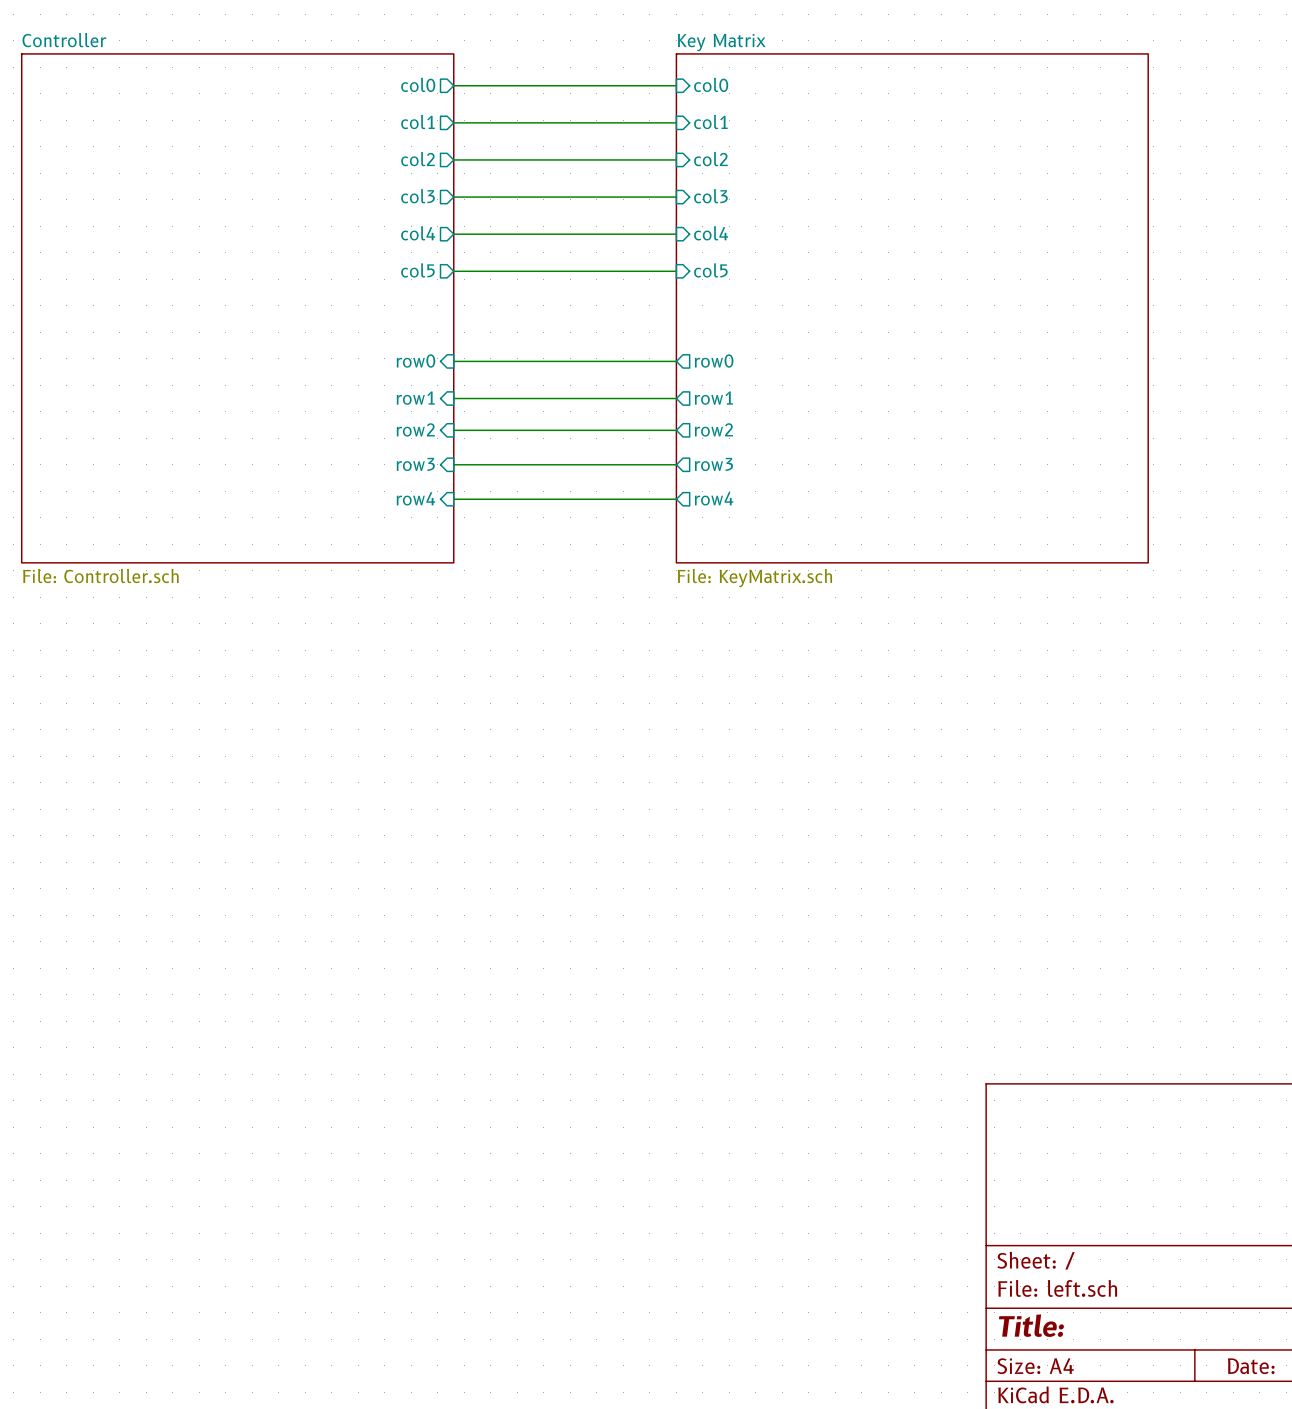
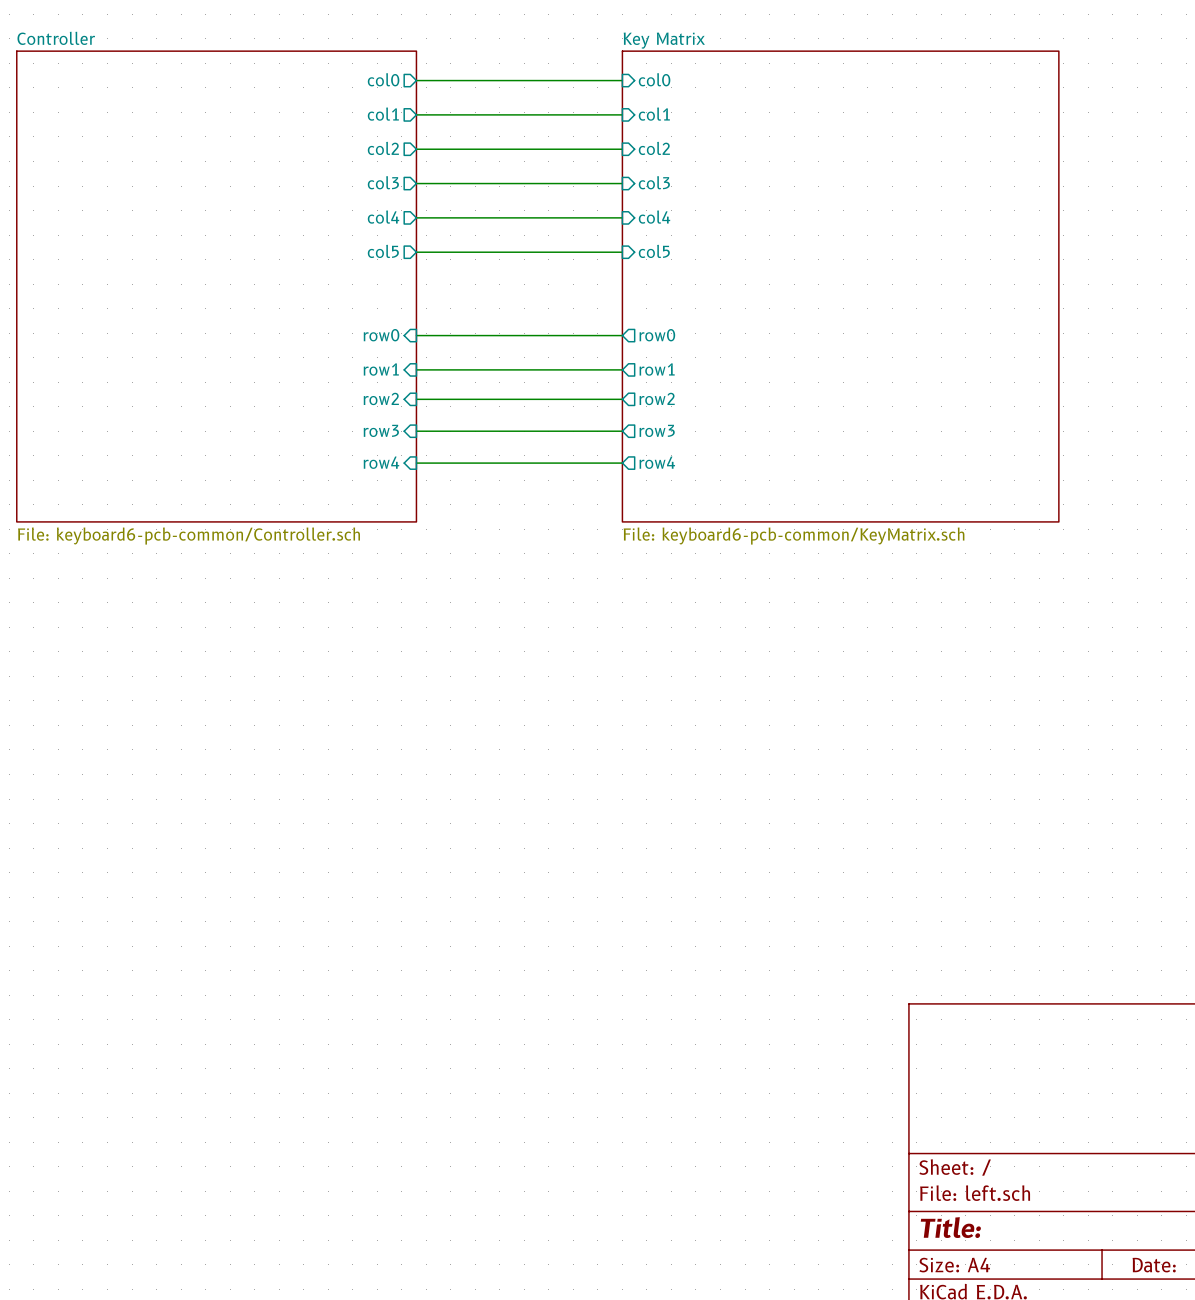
sheet Controller value: File: Controller.sch (100, 576) -> File: keyboard6-pcb-common/Controller.sch (189, 536)
sheet Key Matrix value: File: KeyMatrix.sch (754, 578) -> File: keyboard6-pcb-common/KeyMatrix.sch (794, 536)

